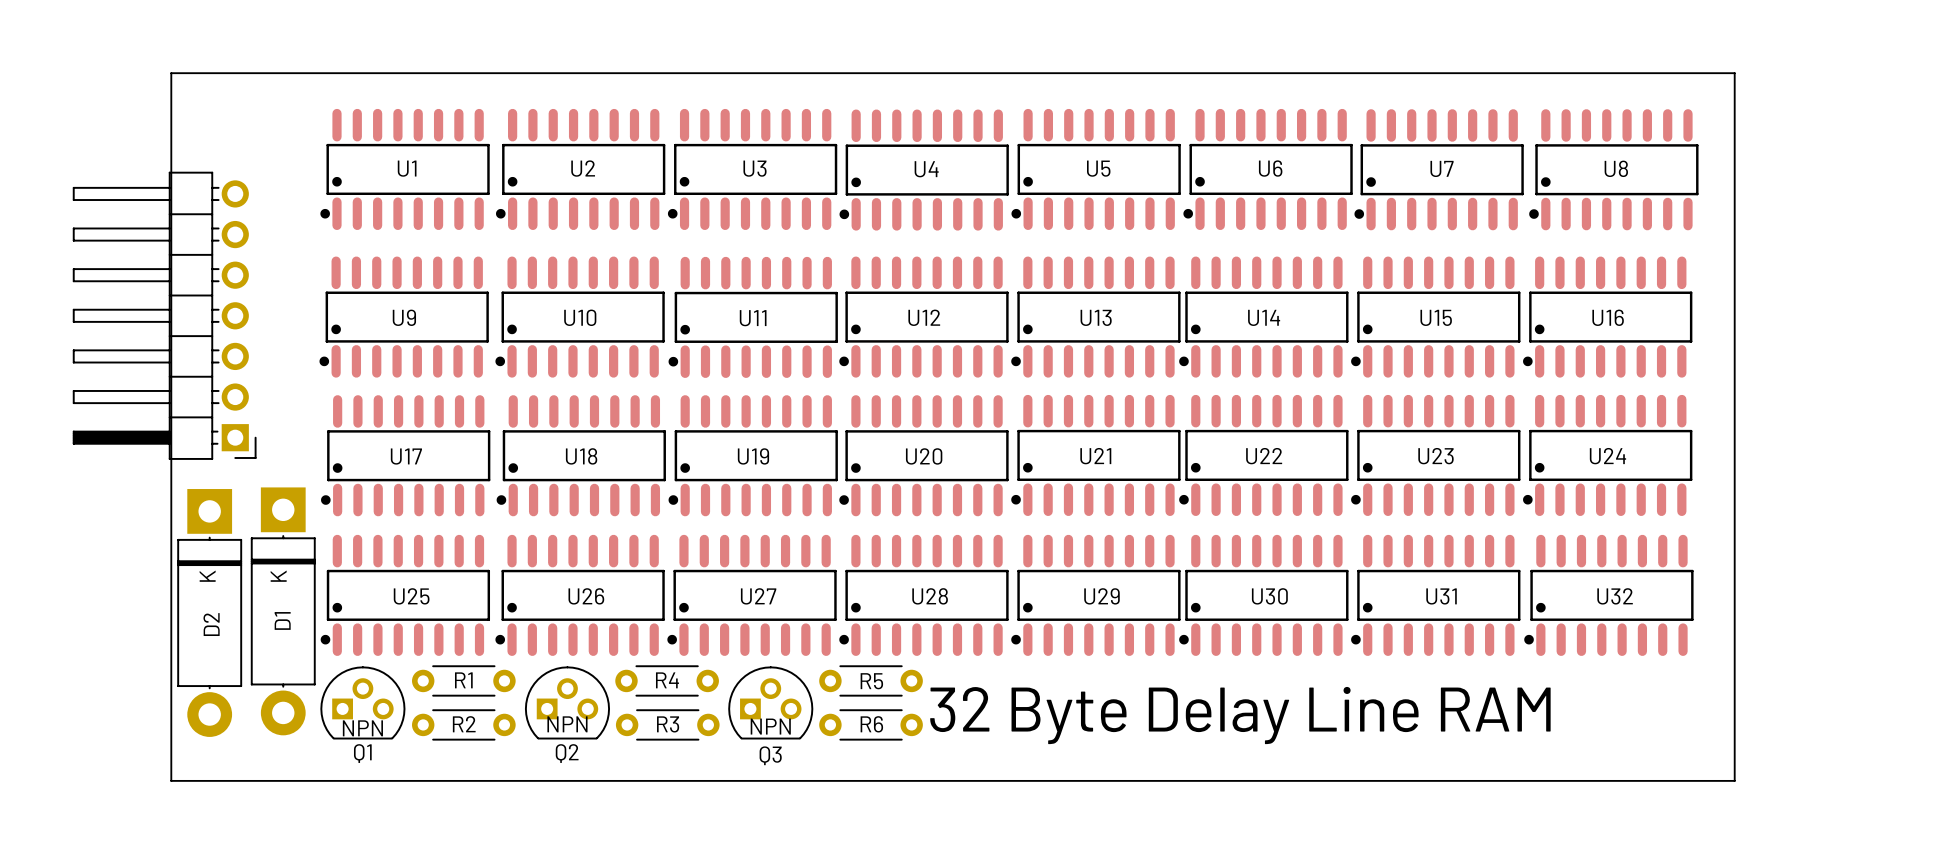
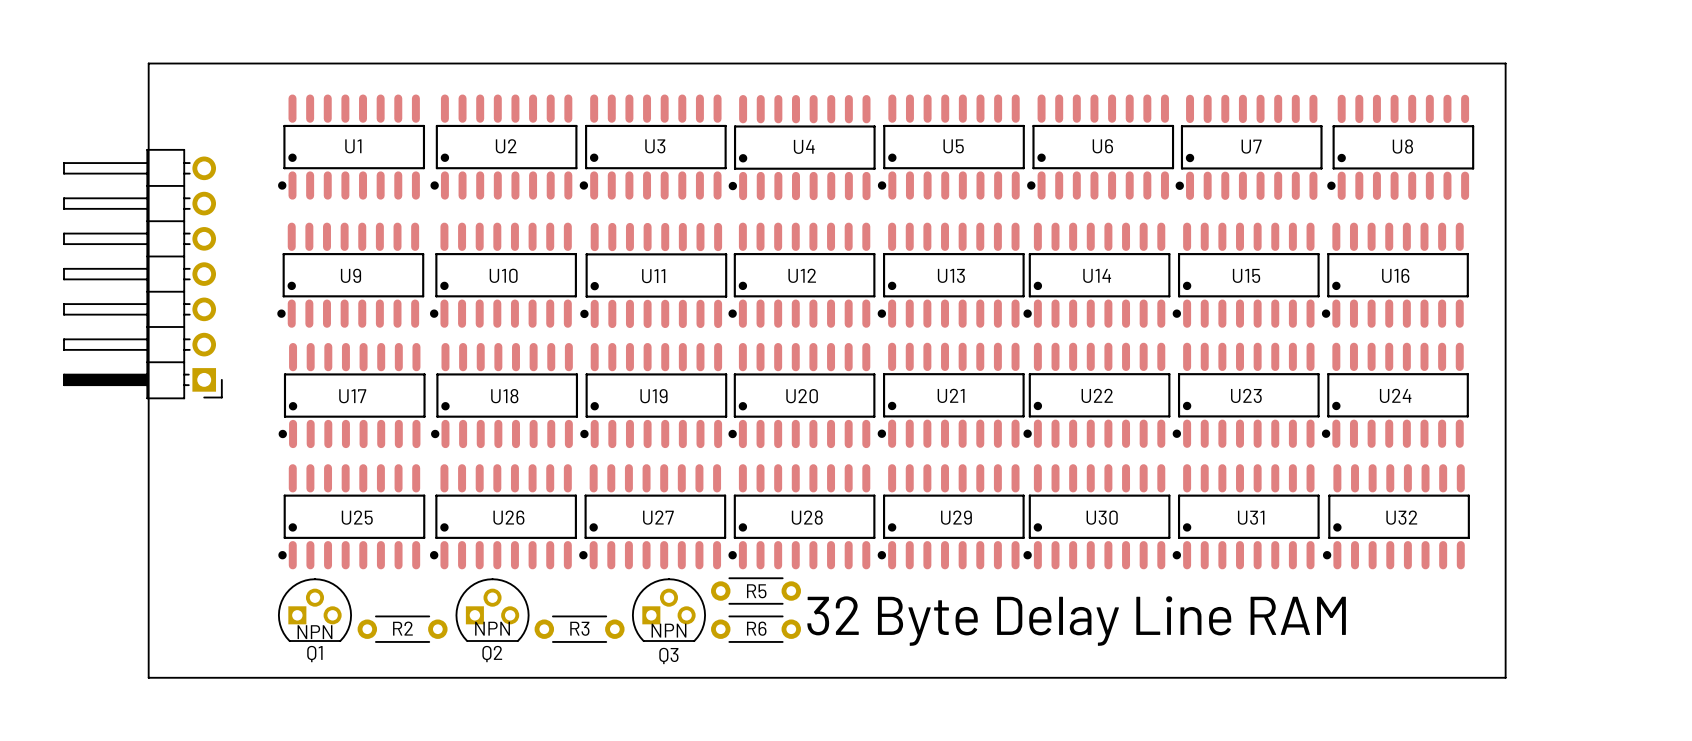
D1: (283, 611) -> none
D2: (209, 612) -> none
R1: (463, 680) -> none
R4: (667, 680) -> none

